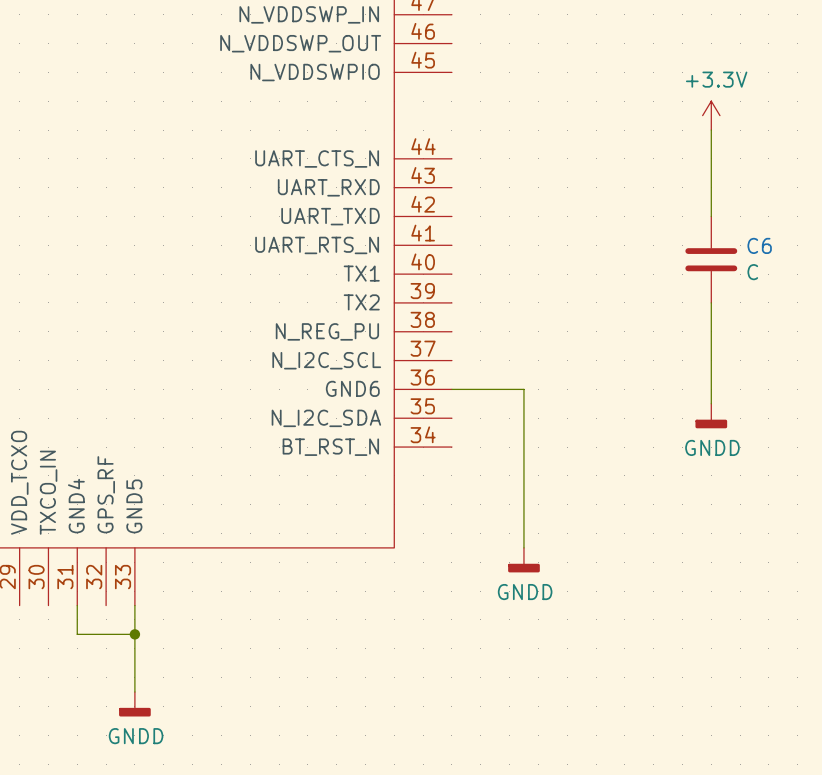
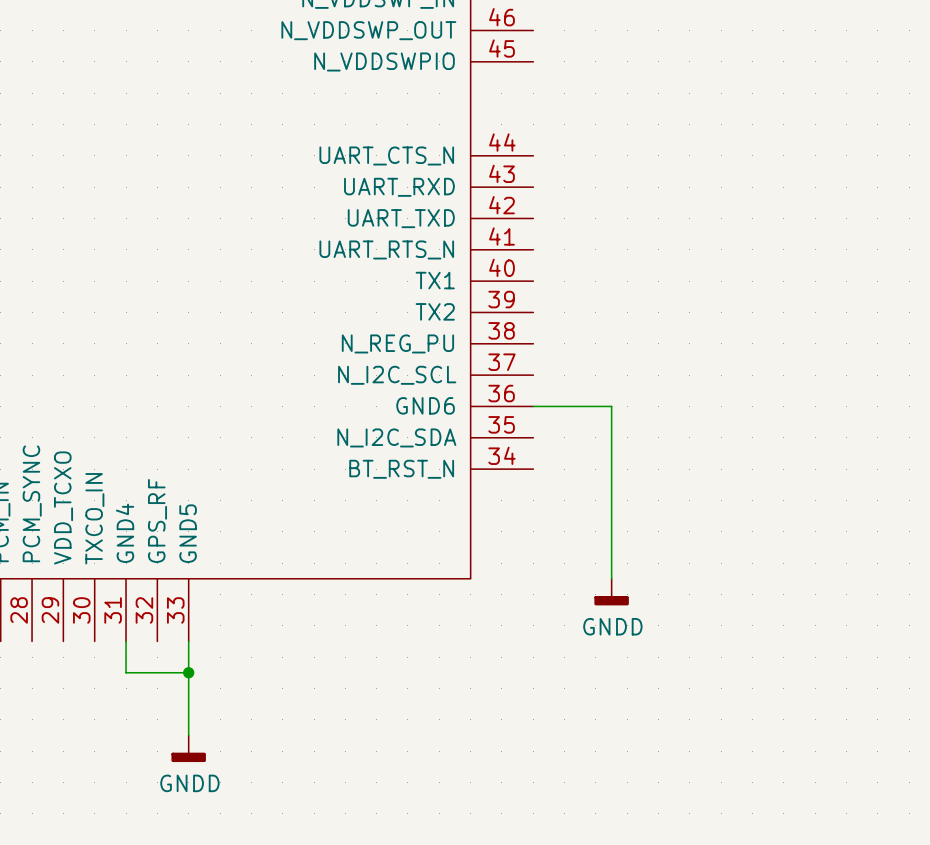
power symbol: +3.3V (711, 115) -> none
wire: (711, 130) (711, 216) -> none
C6: C (711, 259) -> none
wire: (711, 302) (711, 403) -> none
power symbol: GNDD (711, 416) -> none

